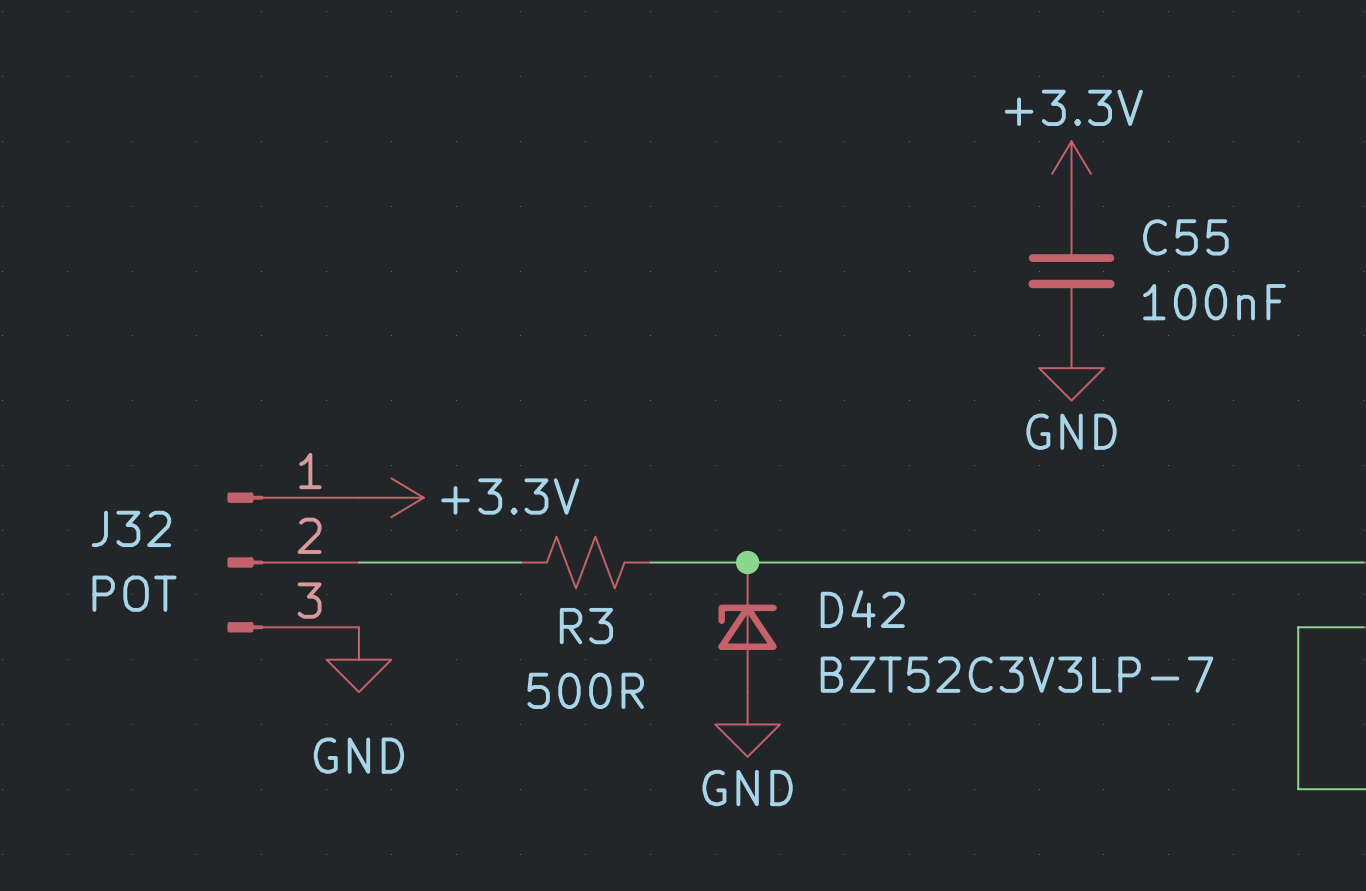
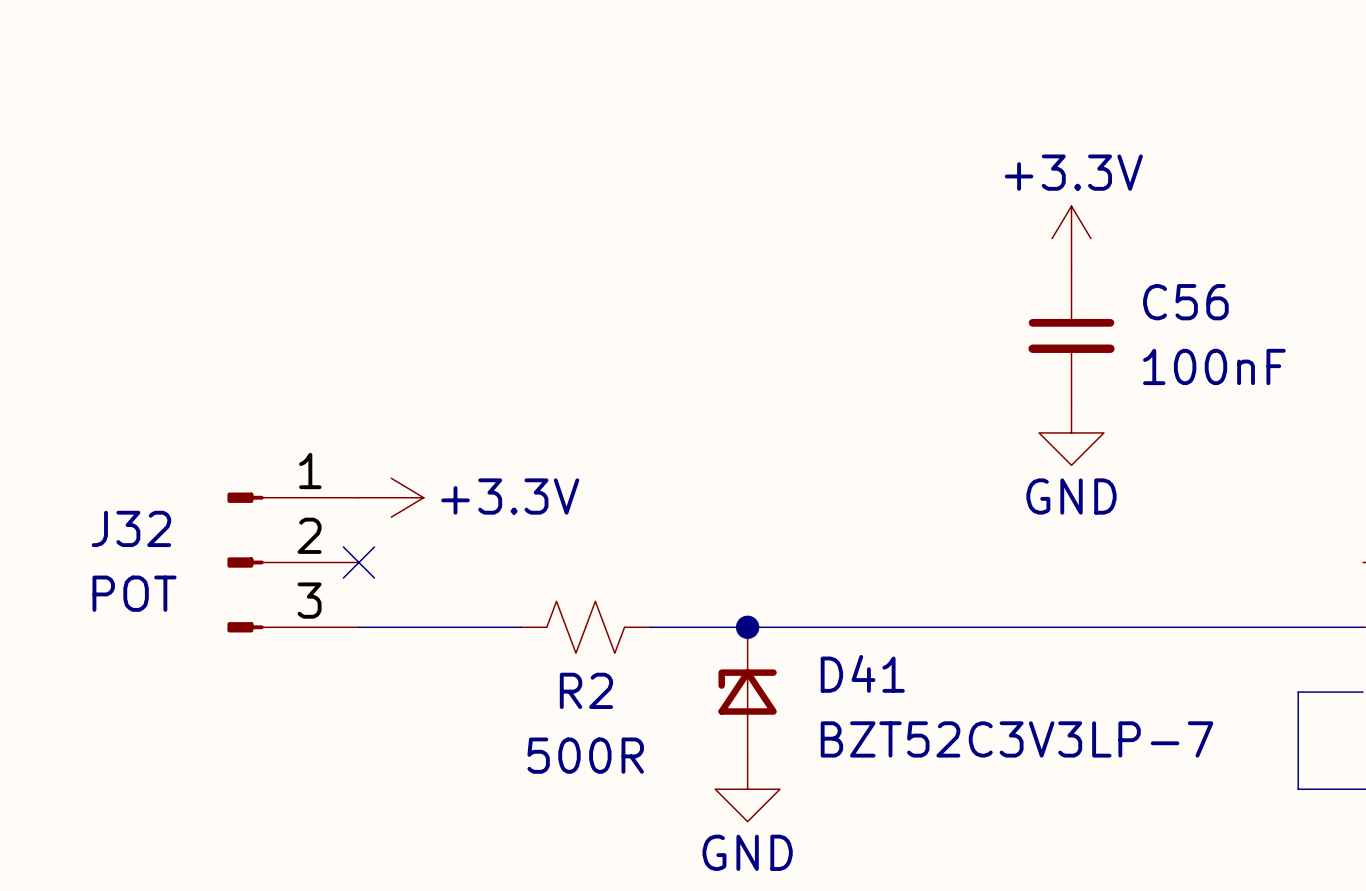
power symbol position: +3.3V (1071, 173) -> +3.3V (1071, 238)
C55: 100nF (1071, 271) -> none
C56: none -> 100nF (1071, 335)
power symbol position: GND (1071, 368) -> GND (1071, 432)
wire: (358, 562) (520, 562) -> (358, 627) (520, 627)
no-connect mark: none -> (358, 562)
R3: 500R (585, 562) -> none
wire: (650, 562) (1363, 562) -> none
junction position: (747, 562) -> (747, 627)
R2: none -> 500R (585, 627)
wire: none -> (650, 627) (1298, 627)
D42: BZT52C3V3LP-7 (747, 627) -> none
wire: (1298, 627) (1298, 692) -> (1363, 692) (1298, 692)
power symbol: GND (358, 659) -> none
D41: none -> BZT52C3V3LP-7 (747, 692)
power symbol position: GND (747, 724) -> GND (747, 789)

